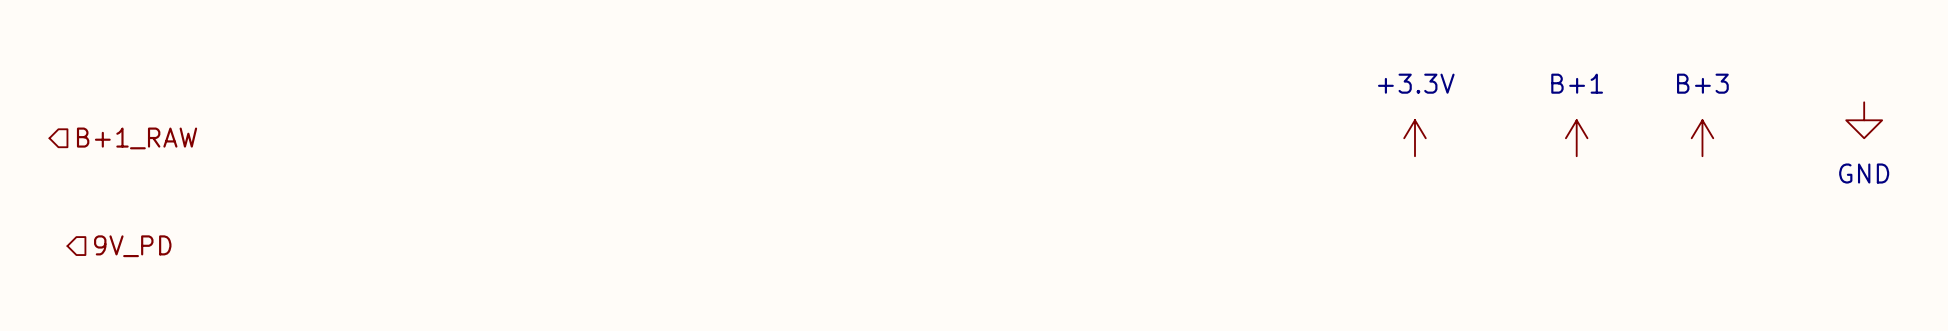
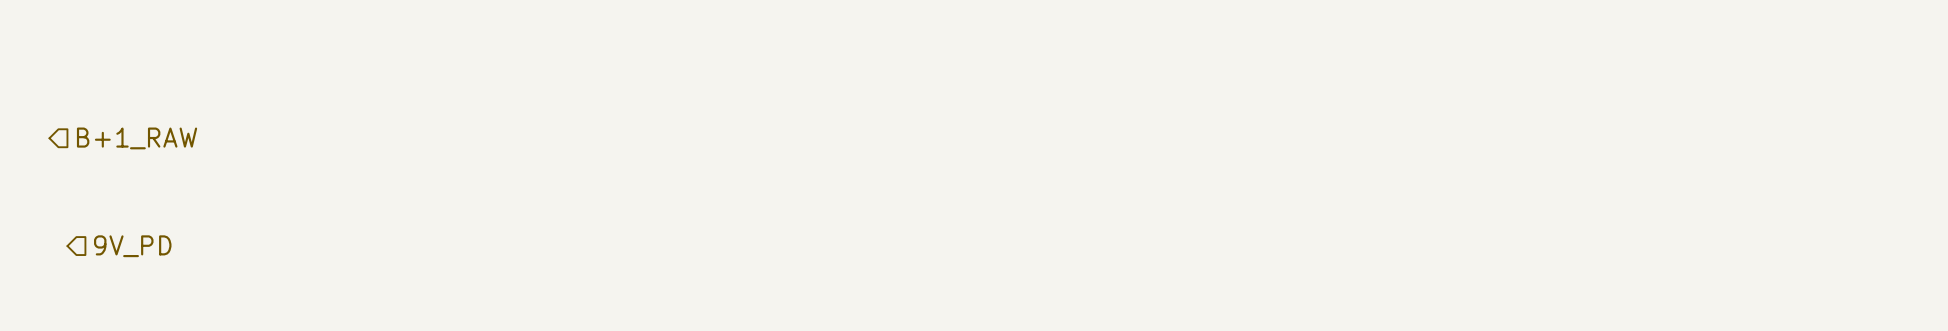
power symbol: GND (1864, 120) -> none
power symbol: +3.3V (1414, 138) -> none
power symbol: B+1 (1576, 138) -> none
power symbol: B+3 (1702, 138) -> none

